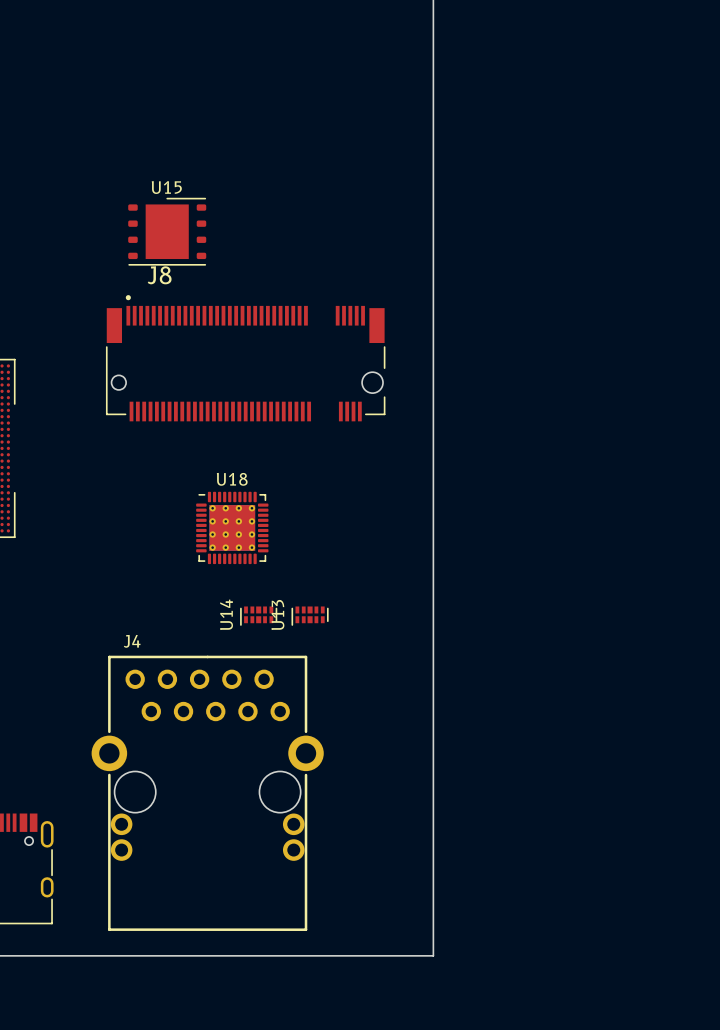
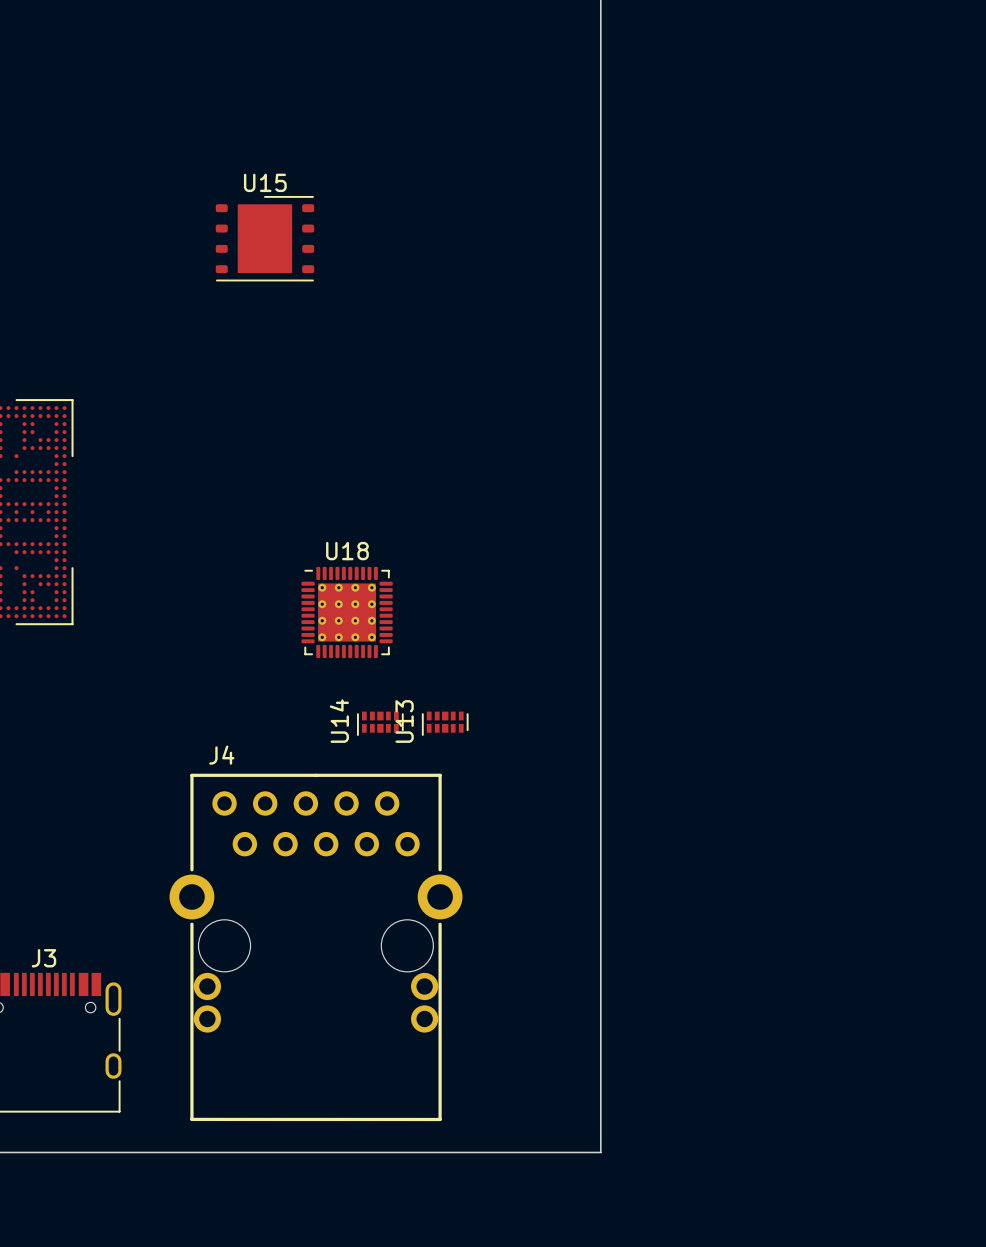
J8: (245, 358) -> none

